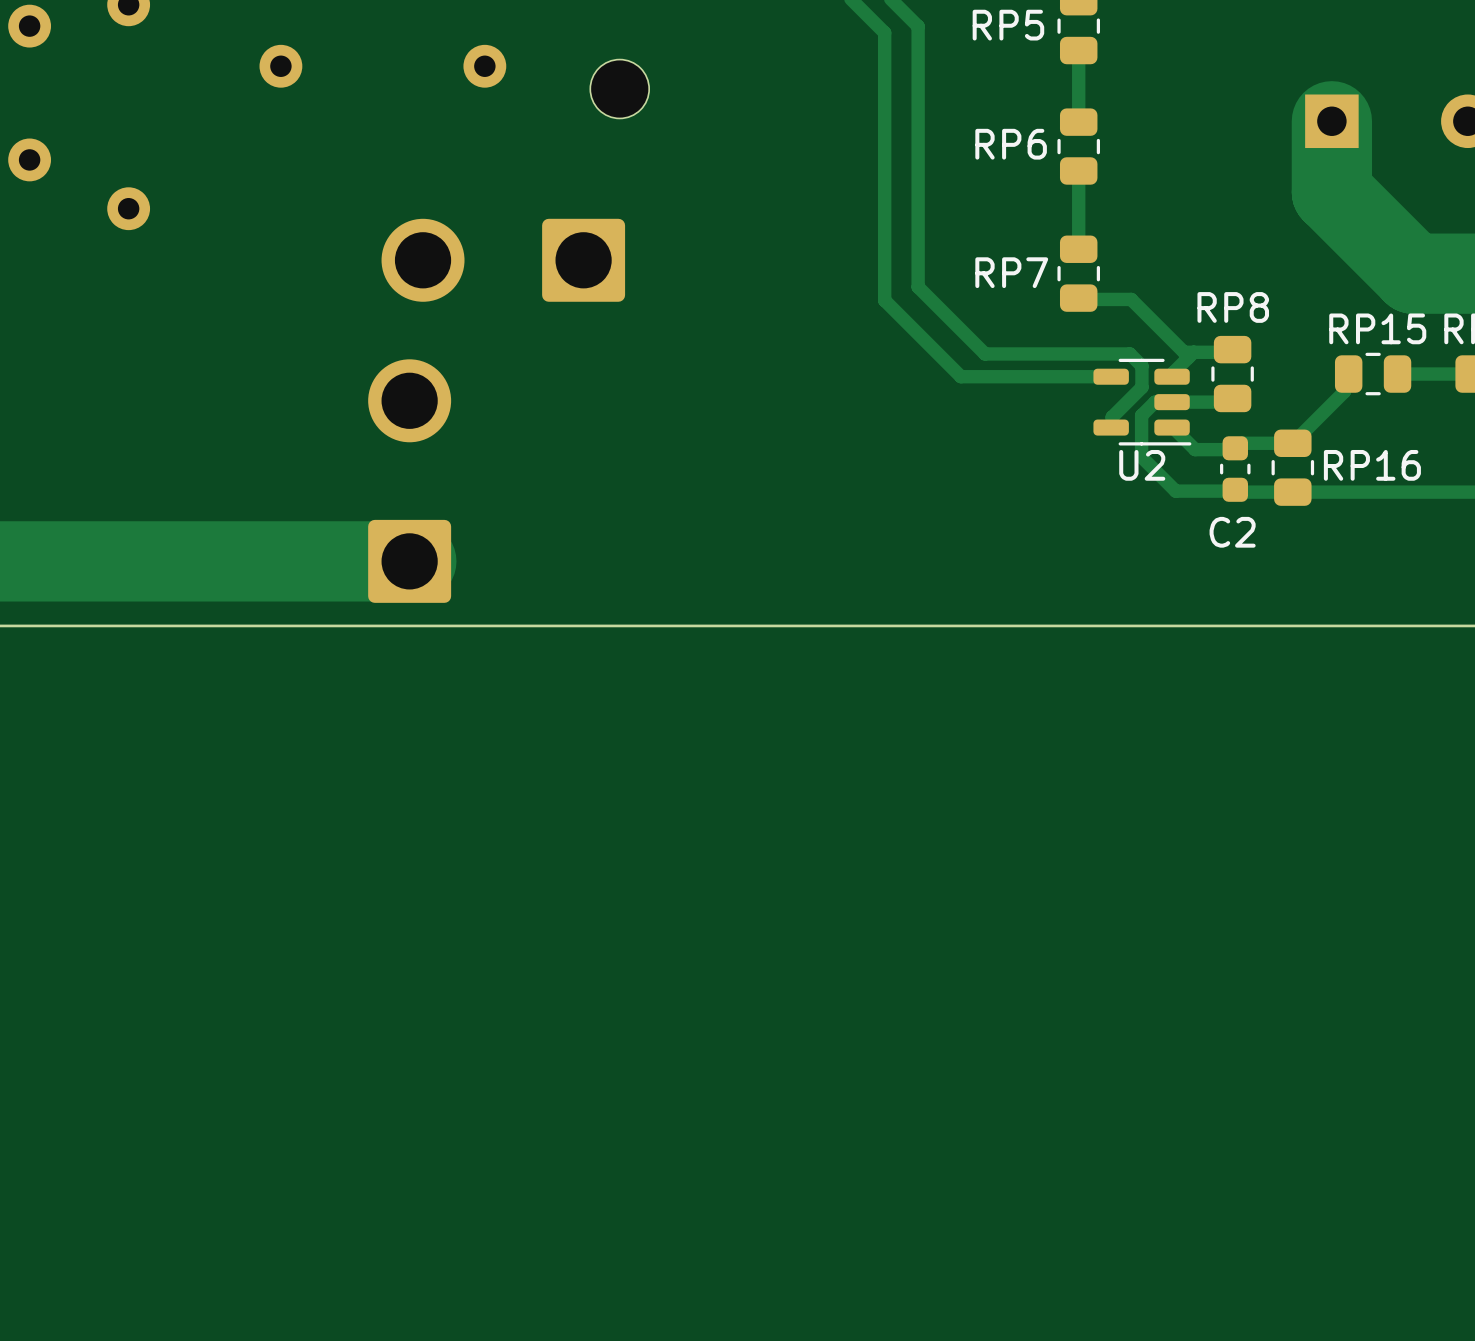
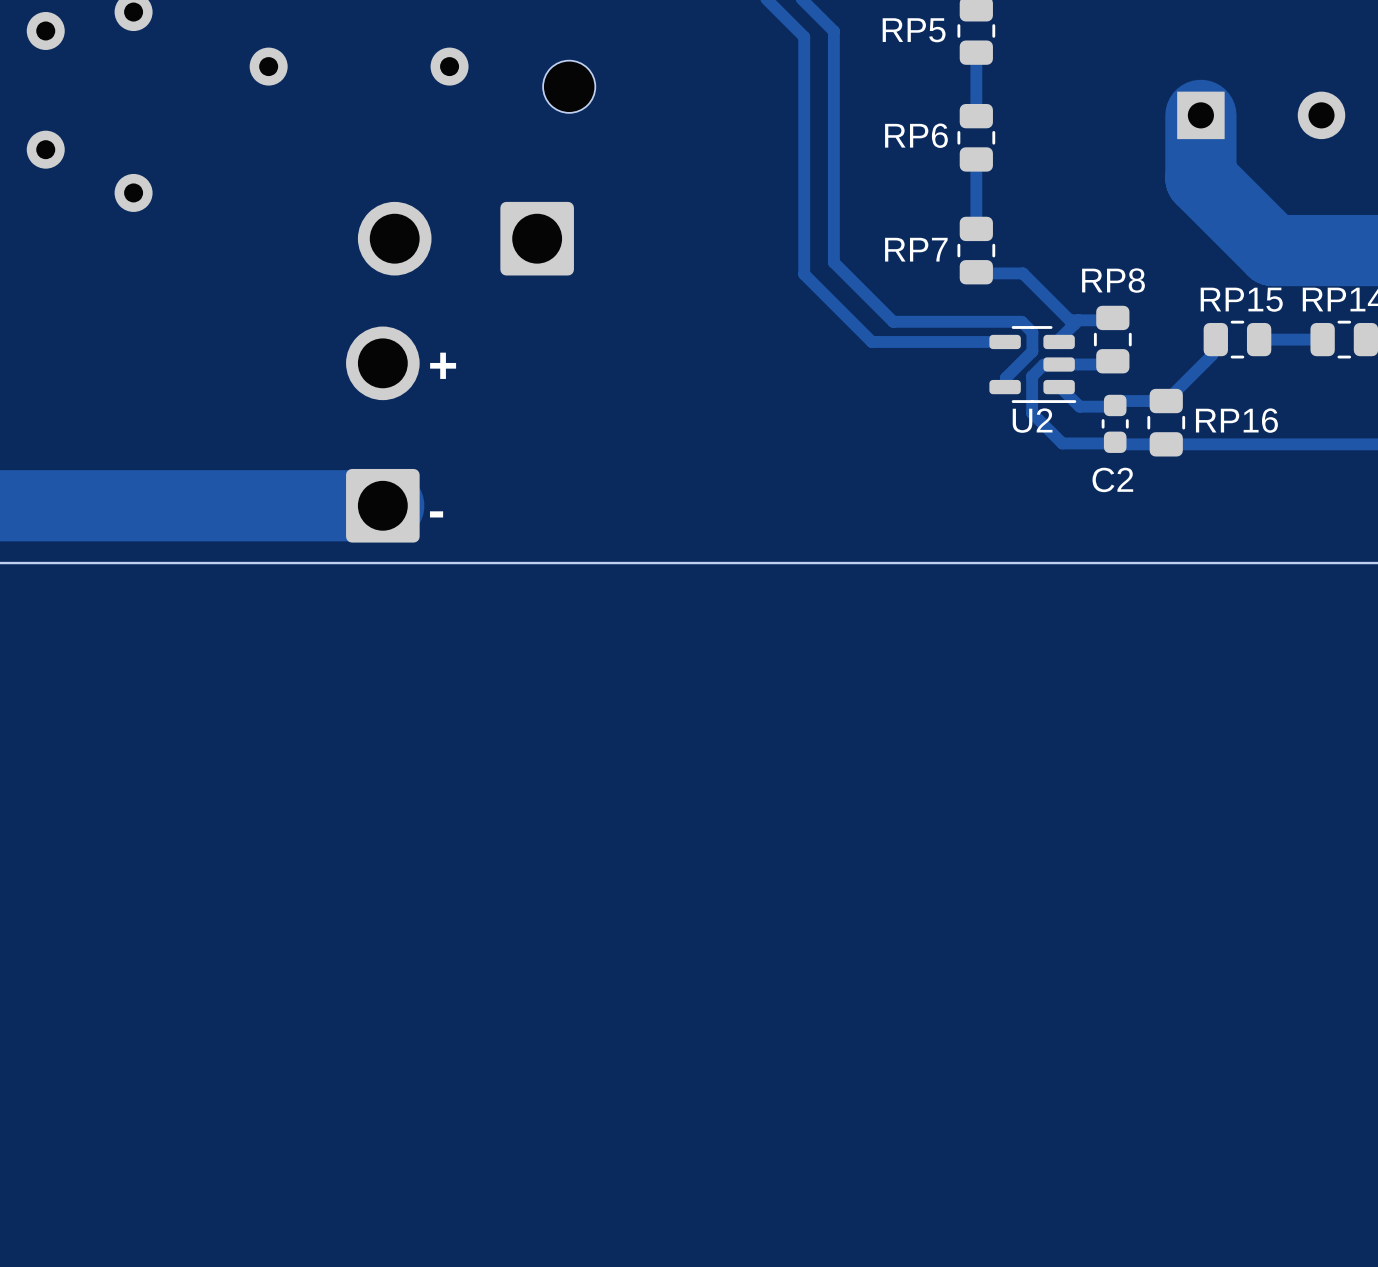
text: none -> + (443, 365)
text: none -> - (436, 514)

